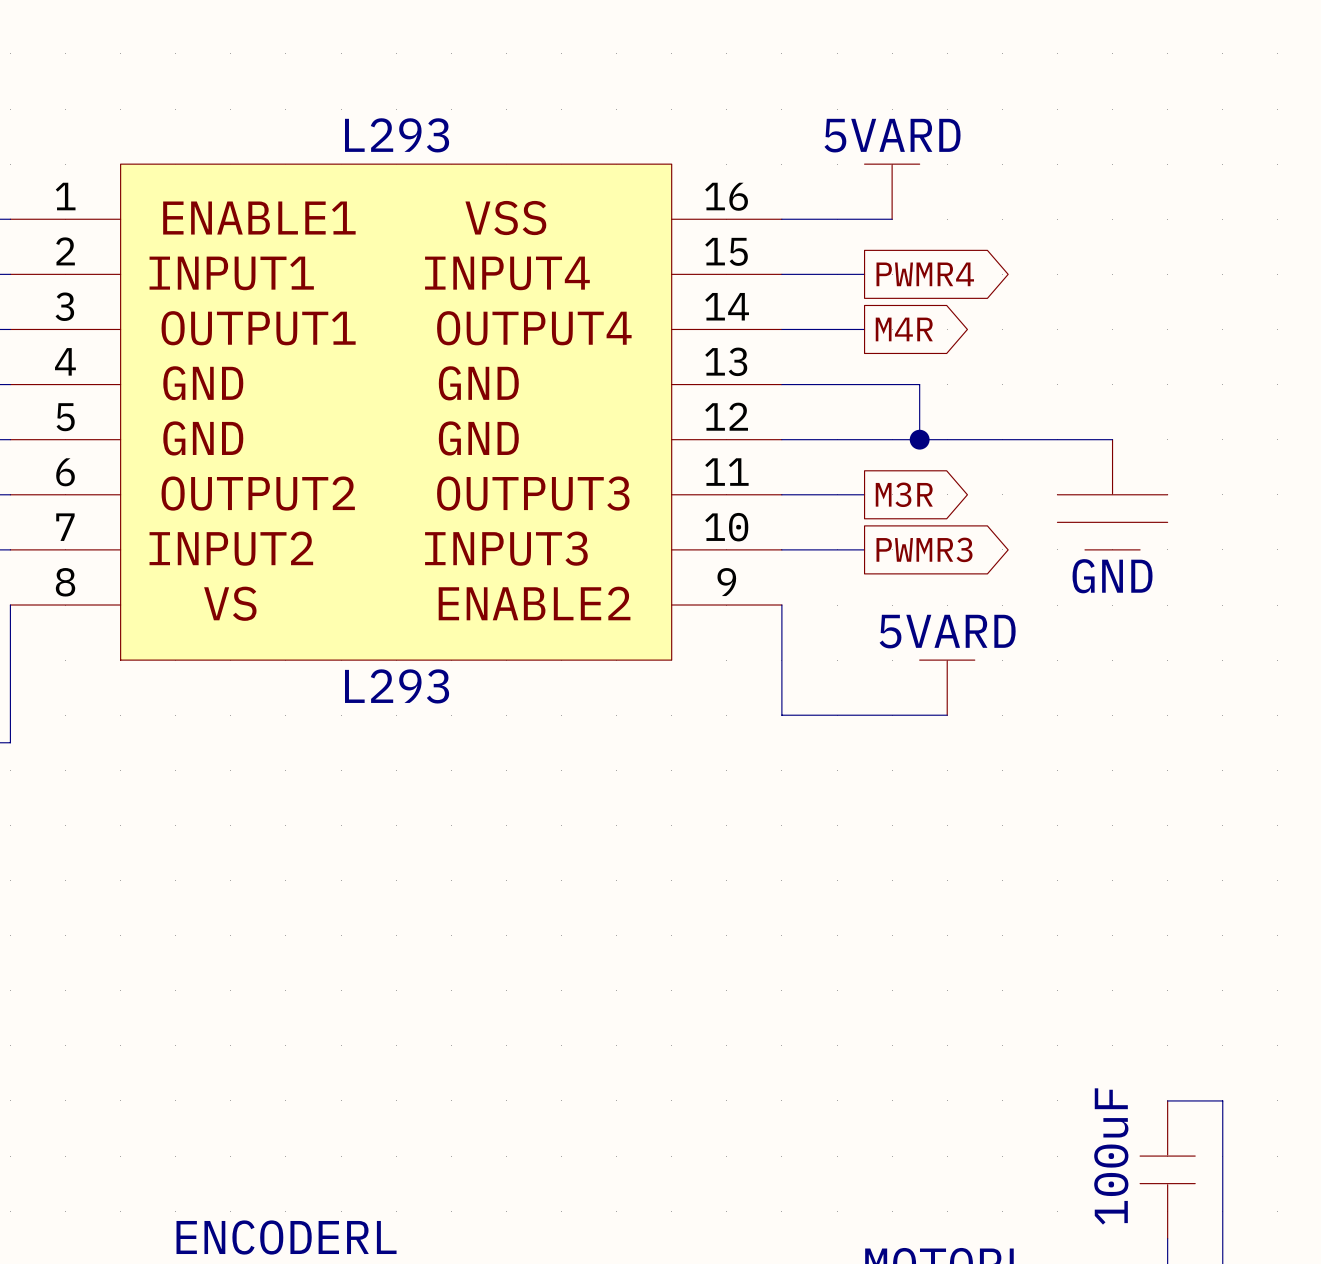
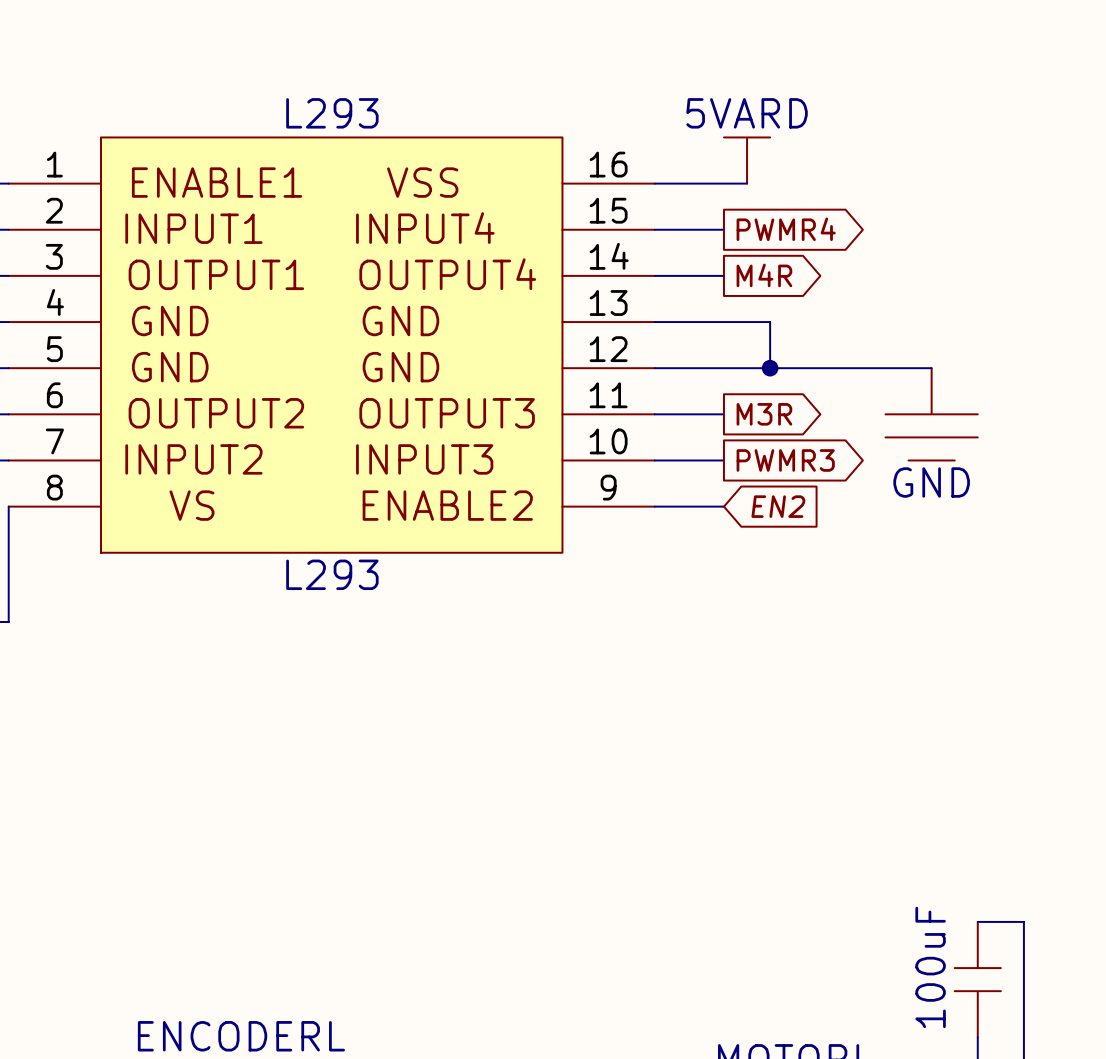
global label: none -> EN2 (778, 506)
wire: (781, 605) (781, 715) (947, 715) -> (654, 506) (723, 506)
part: 5VARD (947, 687) -> none

